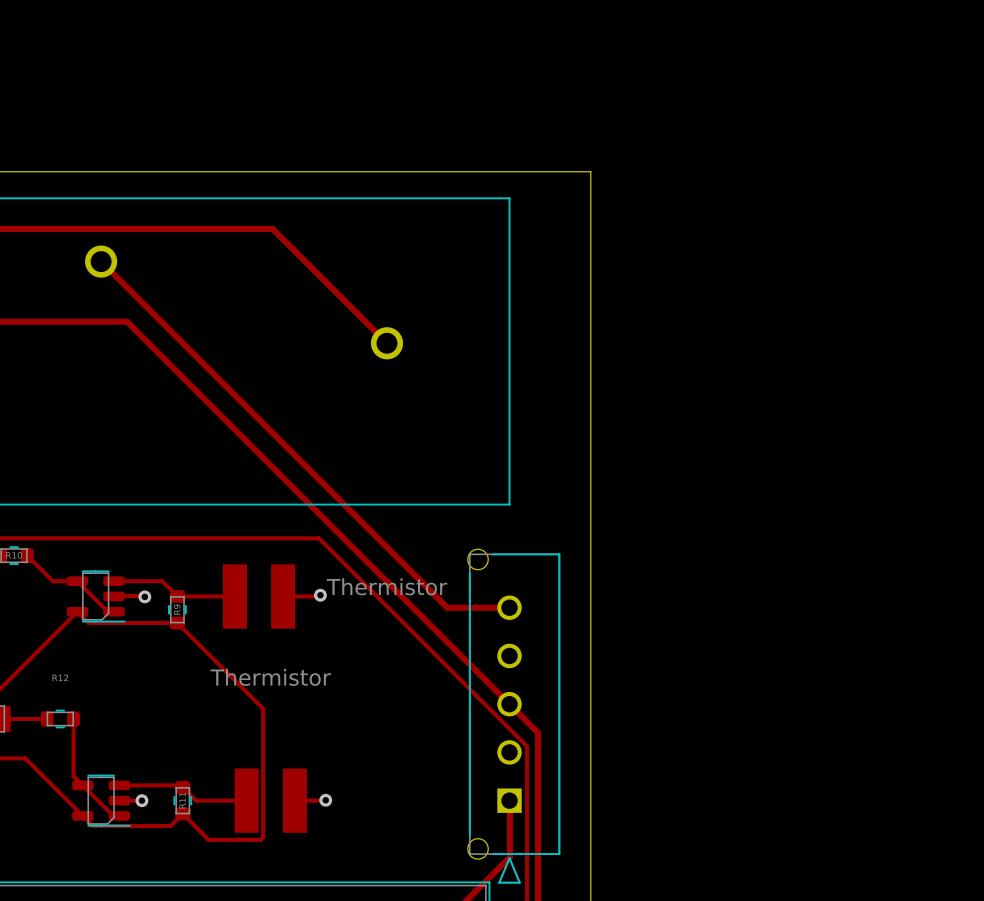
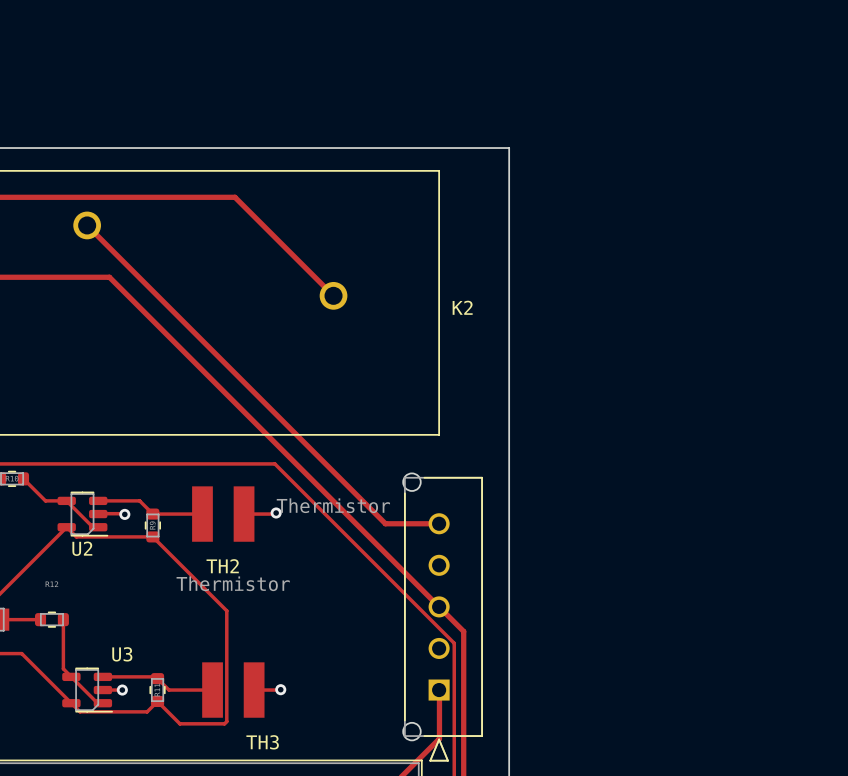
K2 name: none -> K2 (462, 307)
U2 name: none -> U2 (82, 548)
TH2 name: none -> TH2 (222, 566)
U3 name: none -> U3 (122, 654)
TH3 name: none -> TH3 (262, 742)

